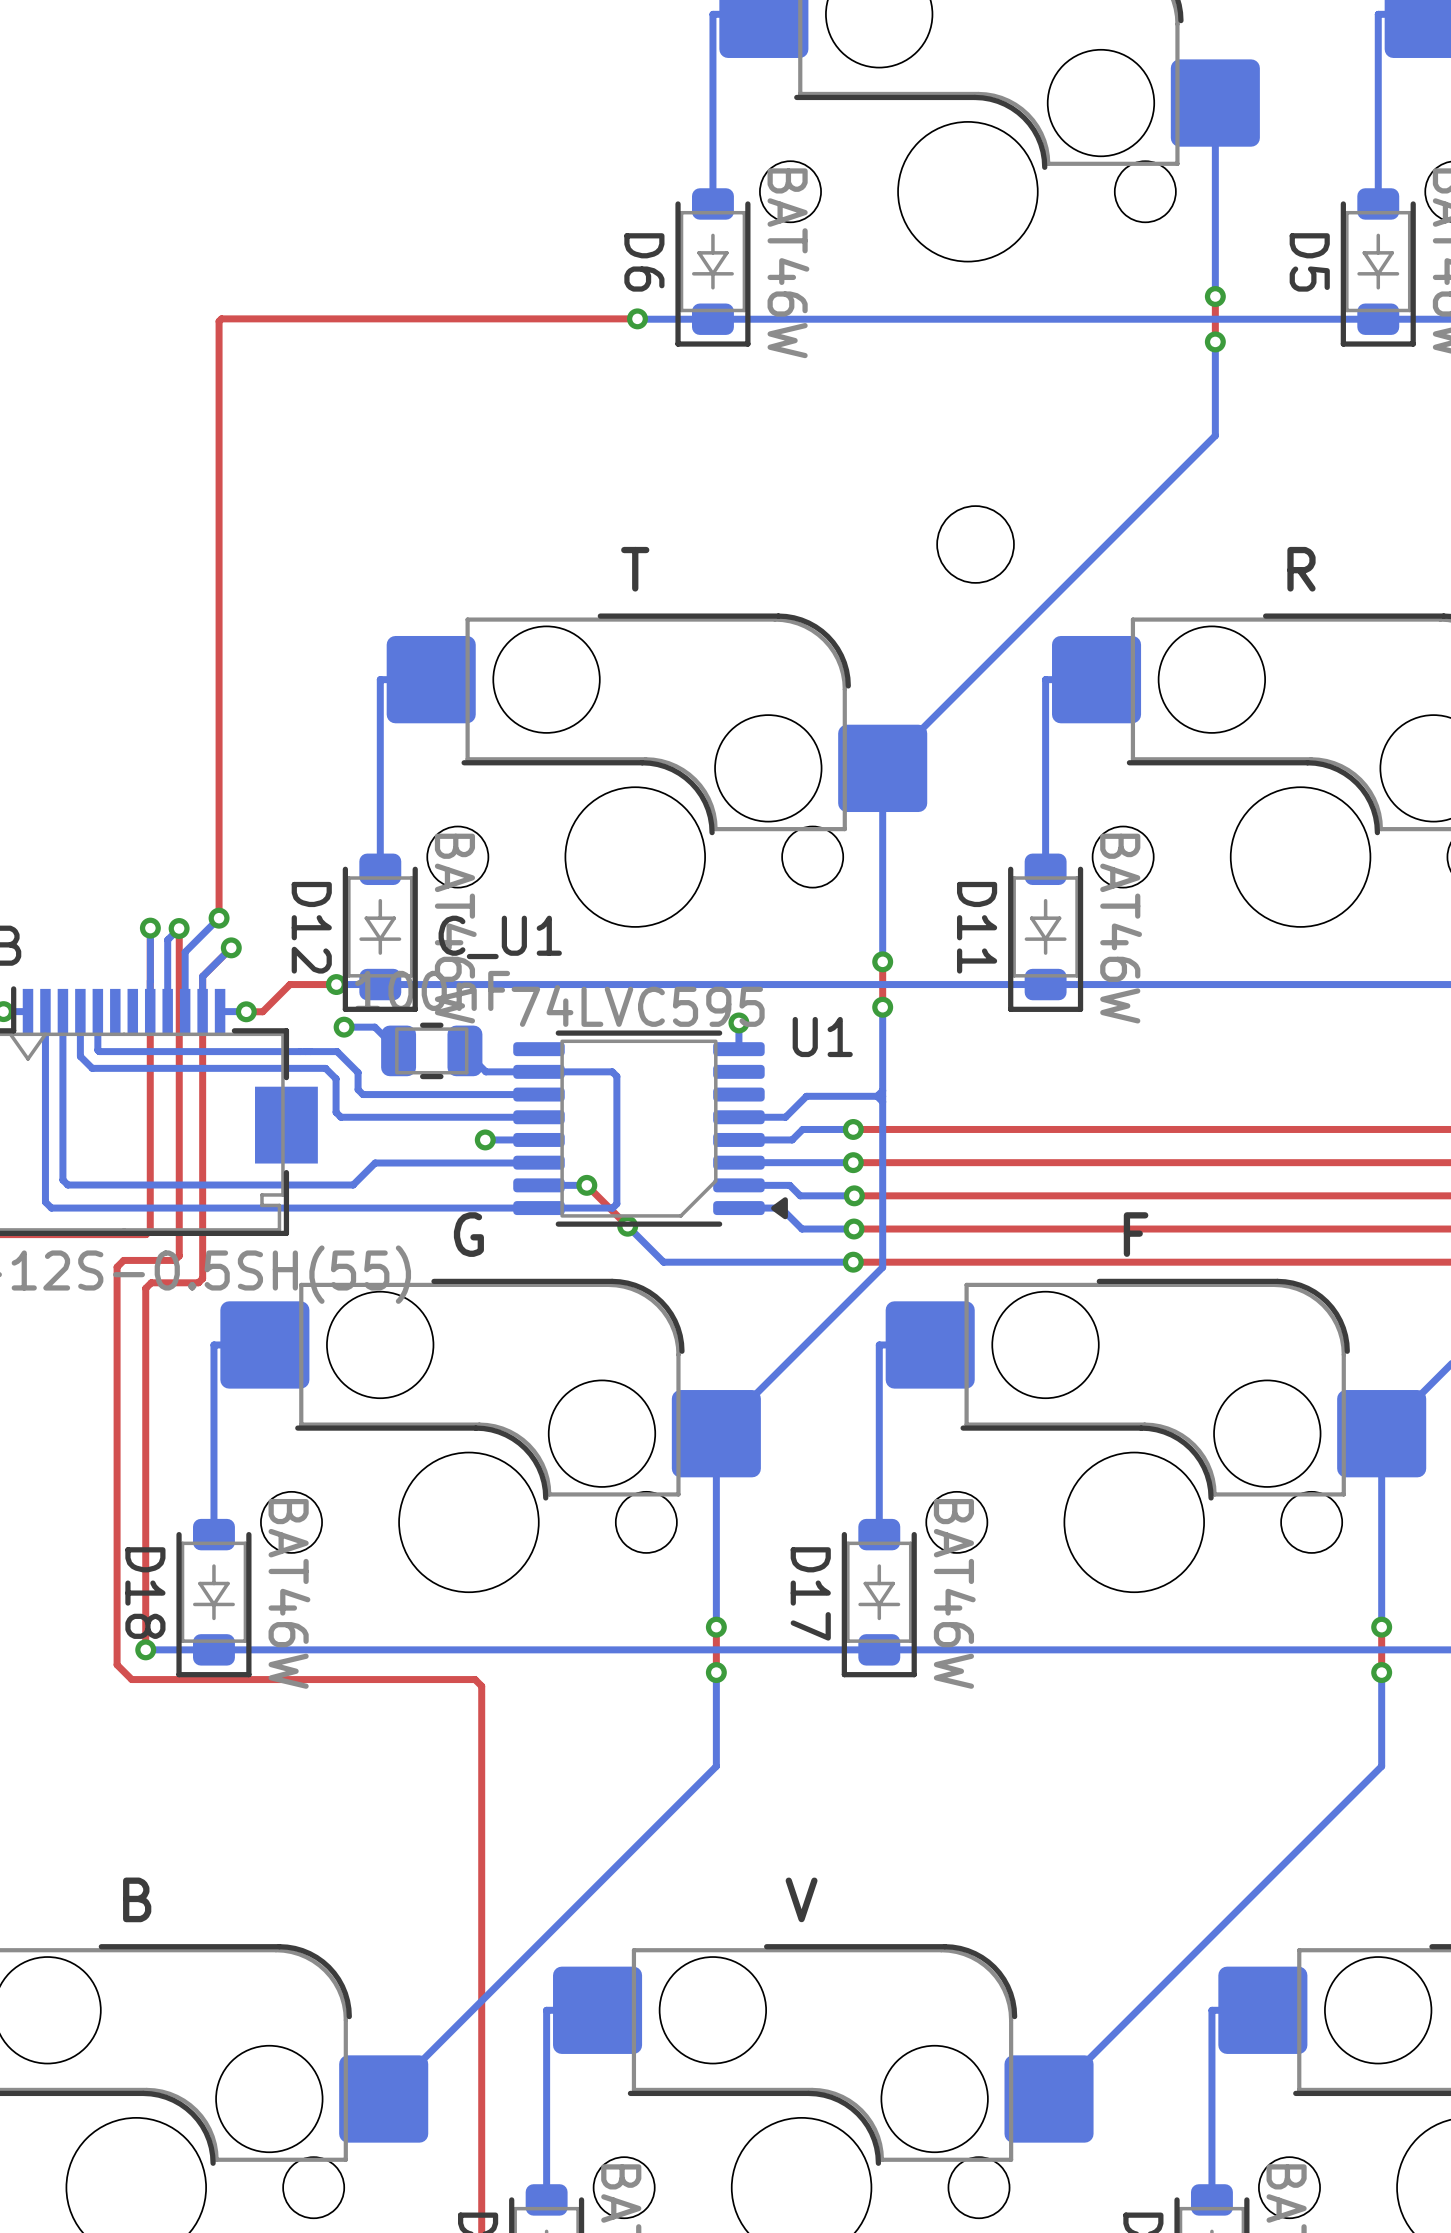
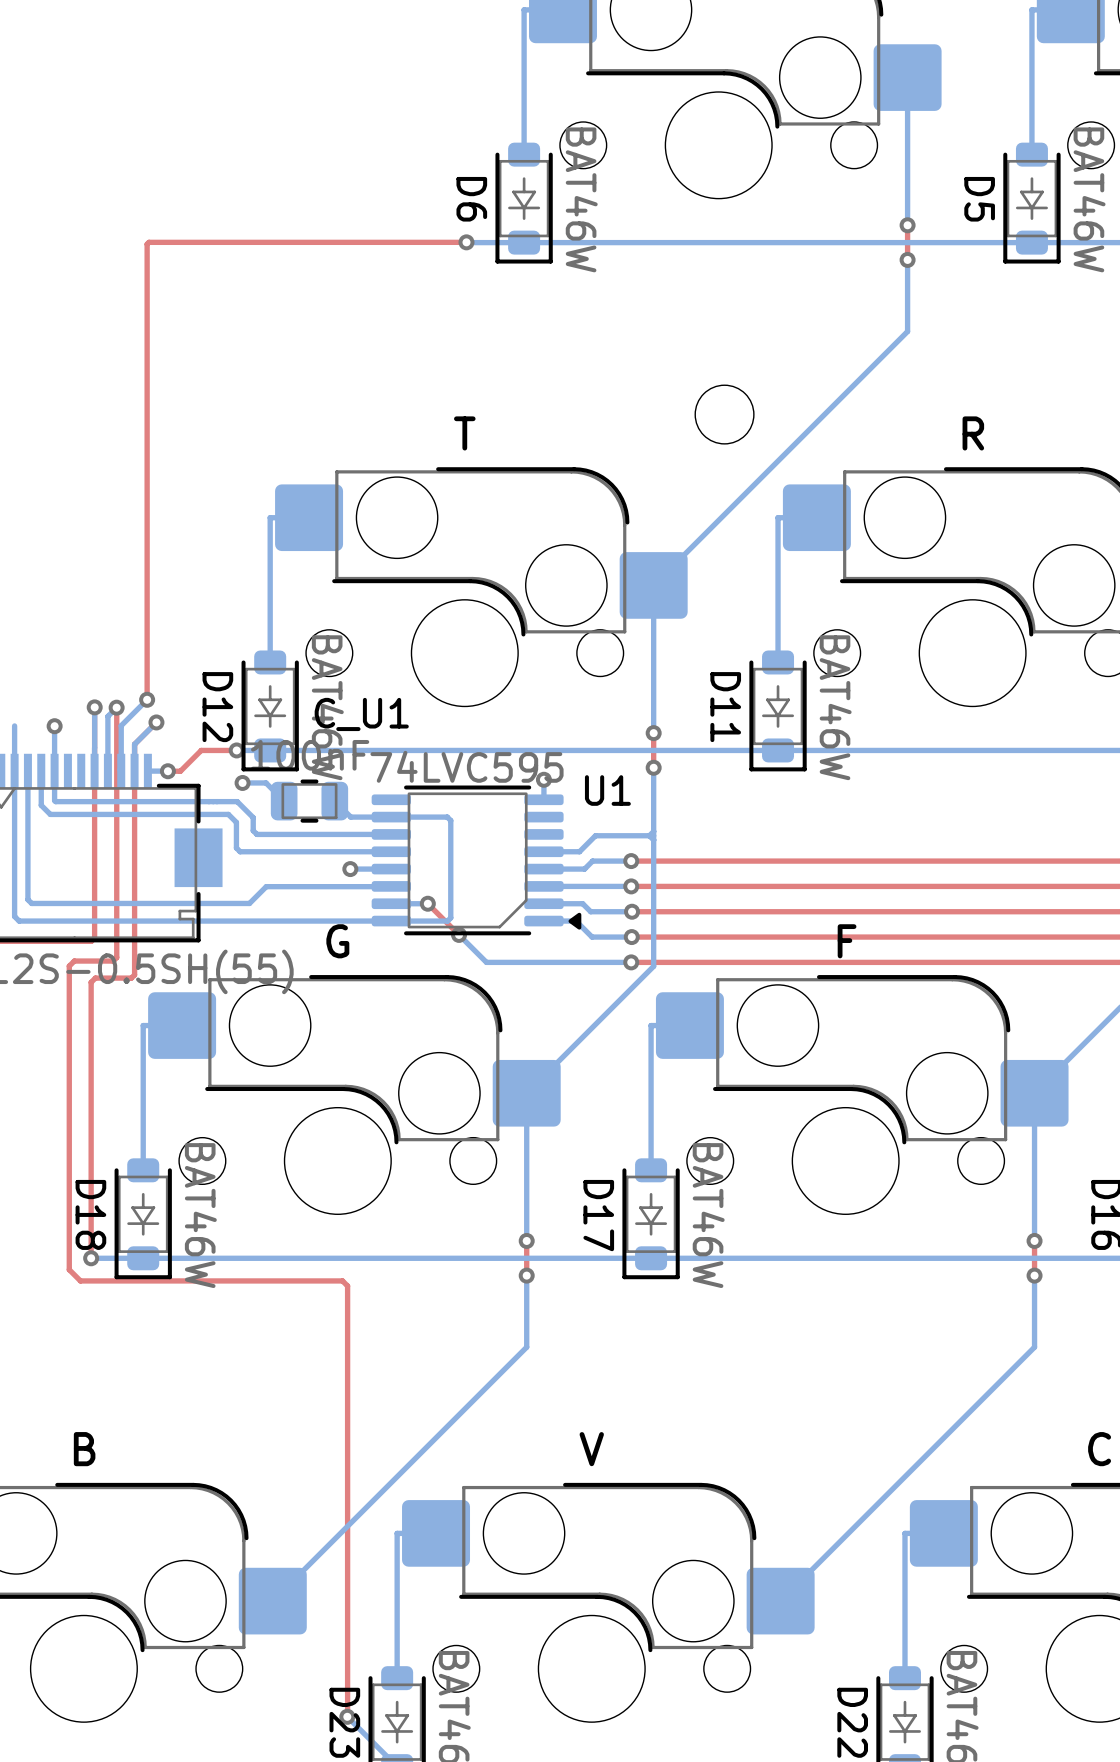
bottom track: none -> (14, 725) (14, 771)
bottom track: none -> (54, 726) (54, 771)
via: none -> (54, 726)

